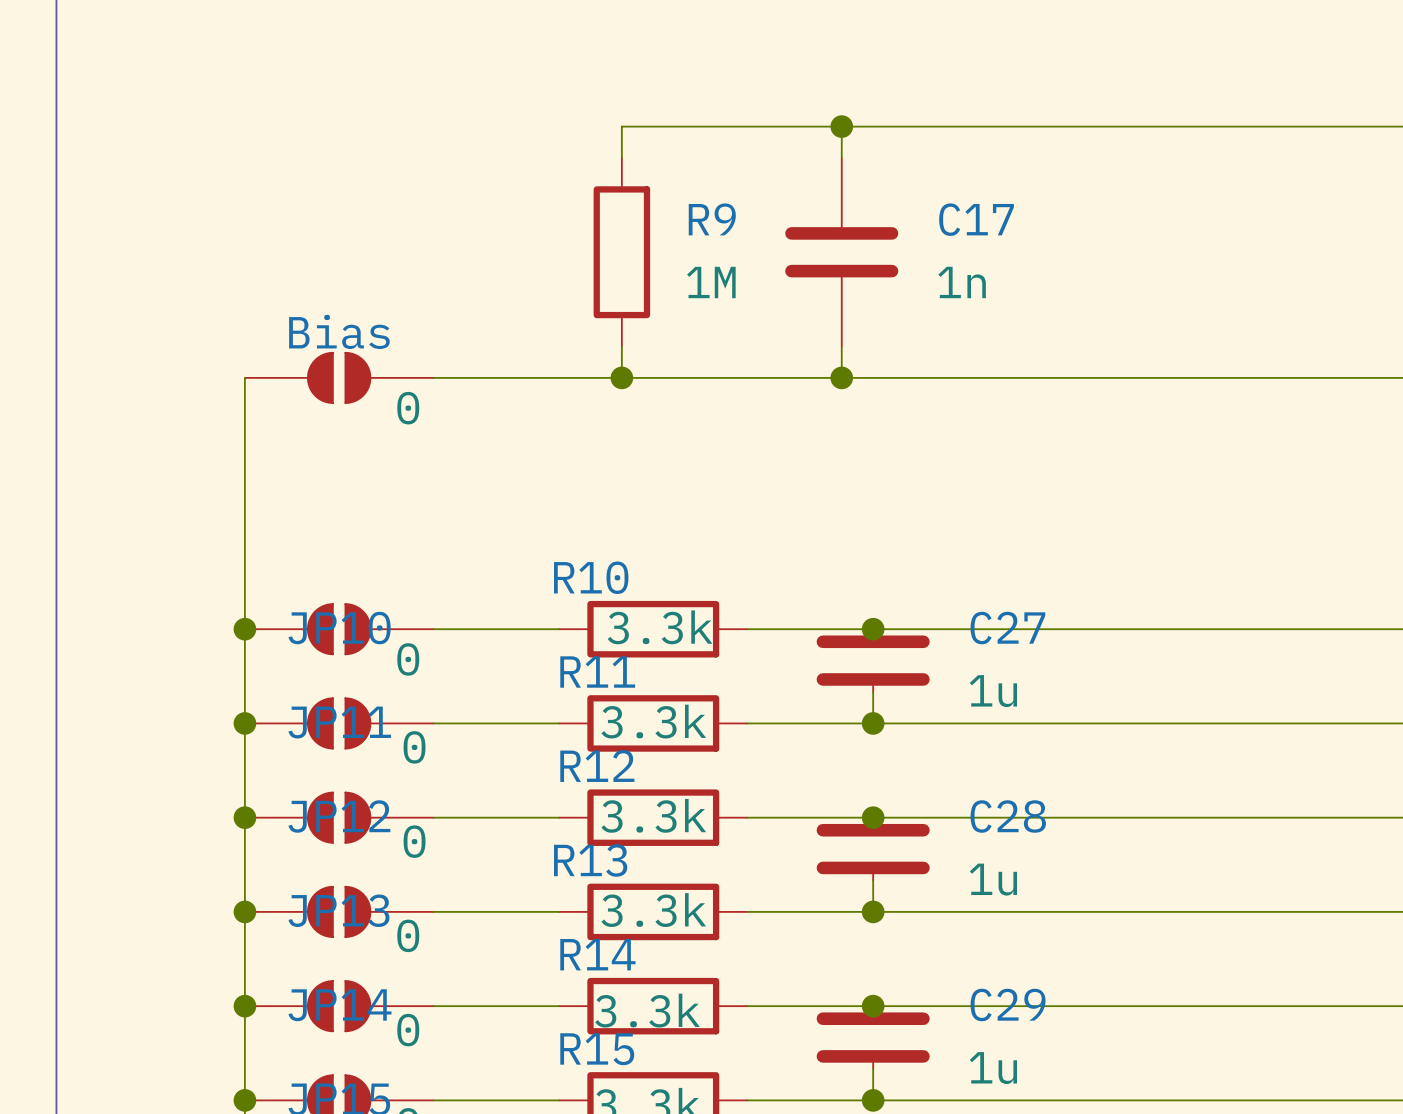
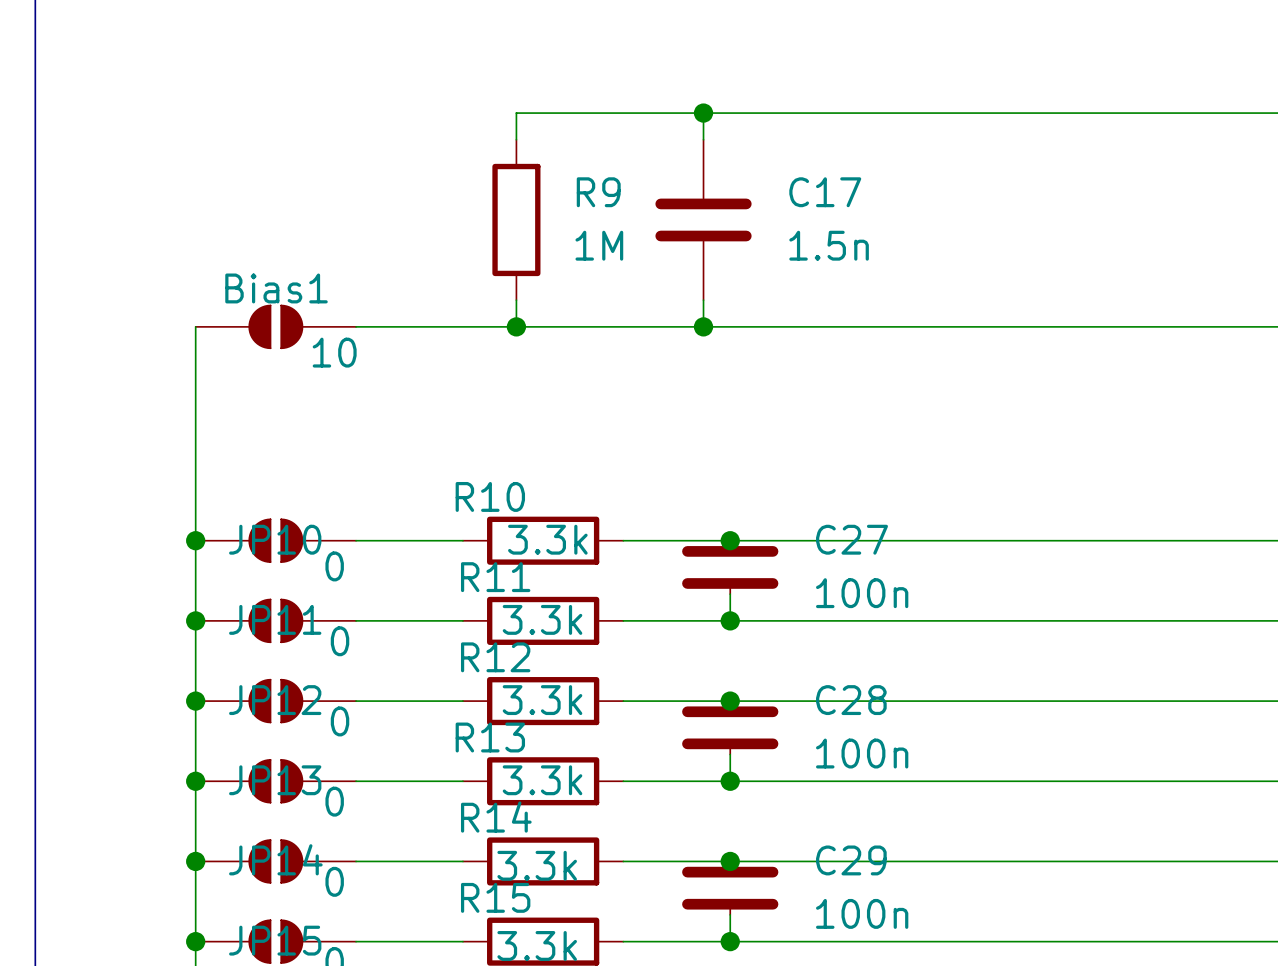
C17 value: 1n (962, 282) -> 1.5n (829, 245)
Bias name: Bias (339, 331) -> Bias1 (276, 288)
Bias value: 0 (408, 408) -> 10 (334, 352)
C27 value: 1u (993, 691) -> 100n (862, 593)
C28 value: 1u (993, 879) -> 100n (862, 753)
C29 value: 1u (993, 1068) -> 100n (862, 913)

